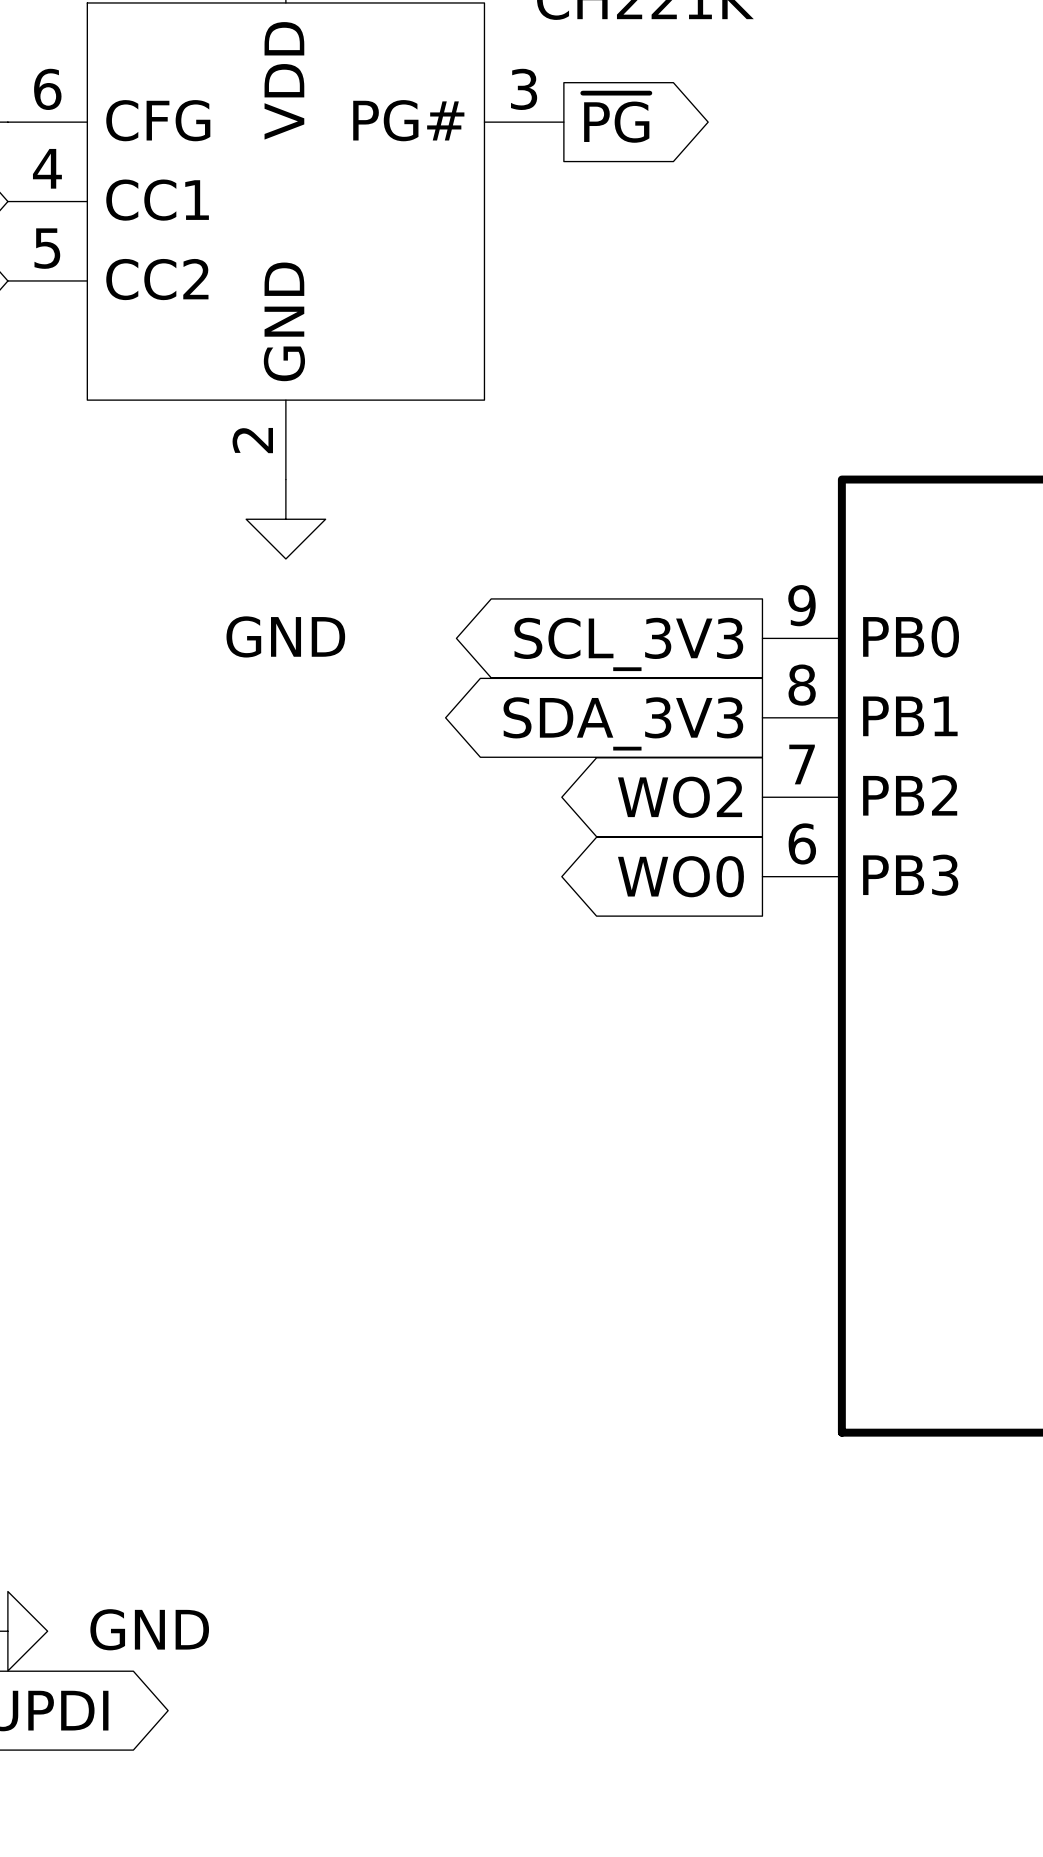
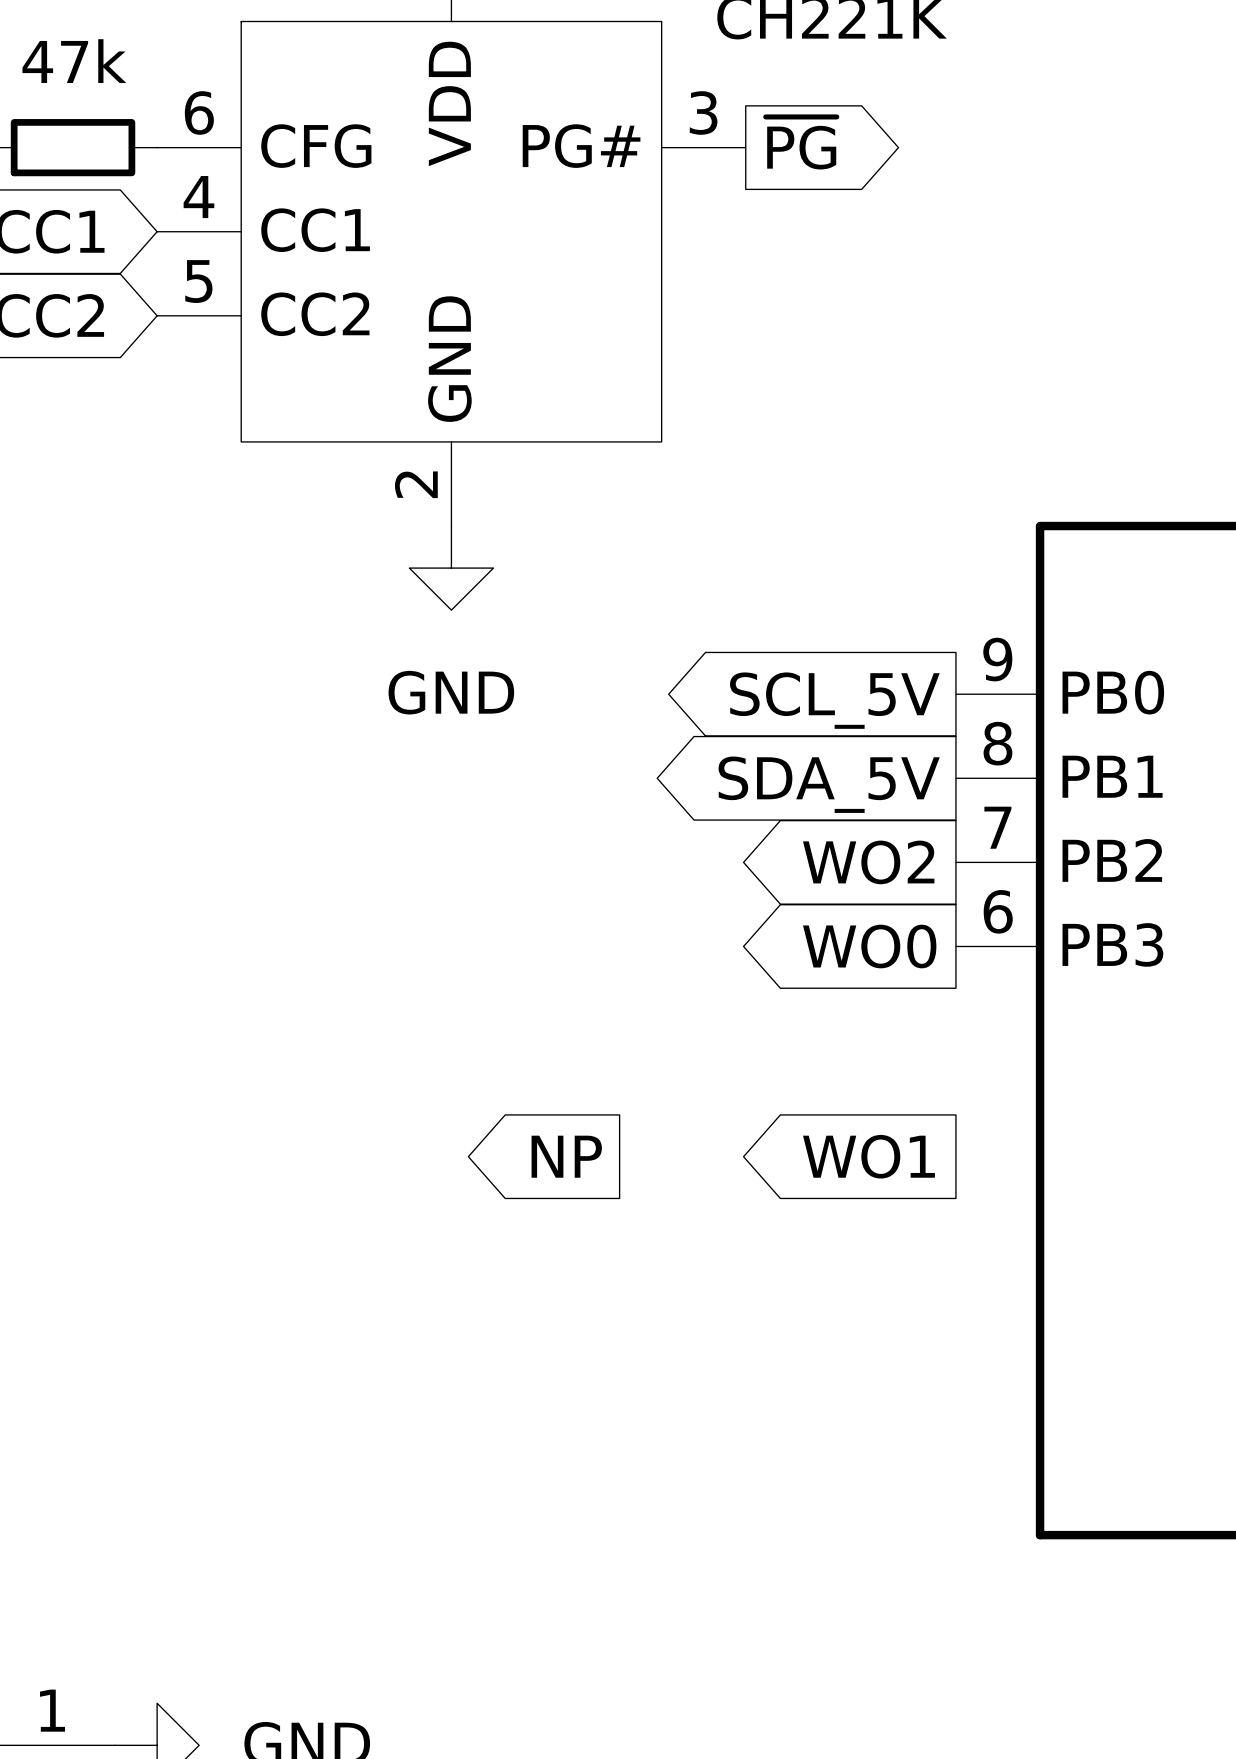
global label: SCL_3V3 (628, 644) -> SCL_5V (834, 700)
global label: SDA_3V3 (623, 723) -> SDA_5V (829, 784)
global label: none -> NP (566, 1156)
global label: none -> WO1 (868, 1156)

